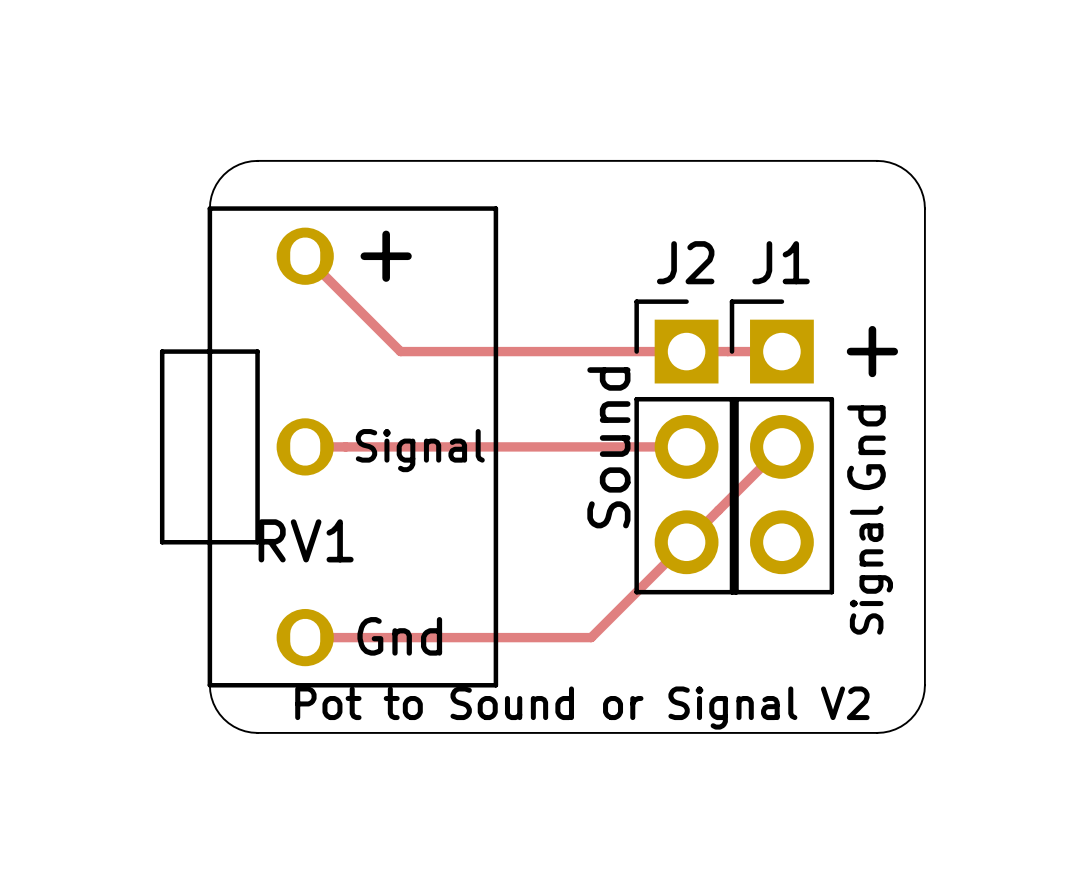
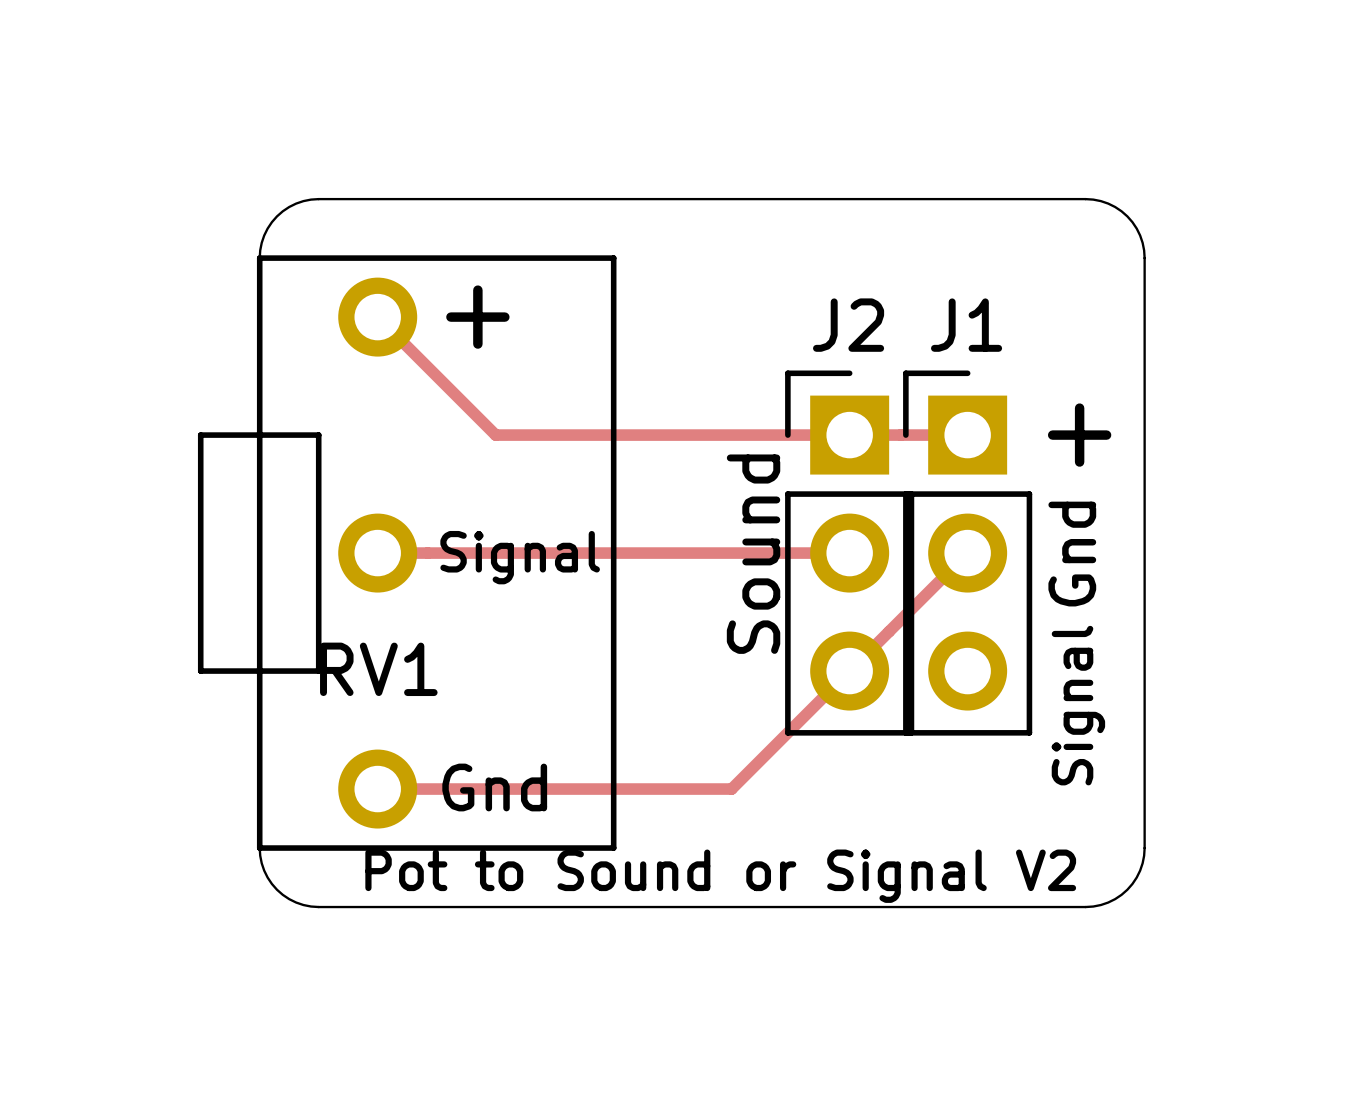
RV1 footprint: [159, 206, 499, 688] -> [197, 255, 617, 851]

